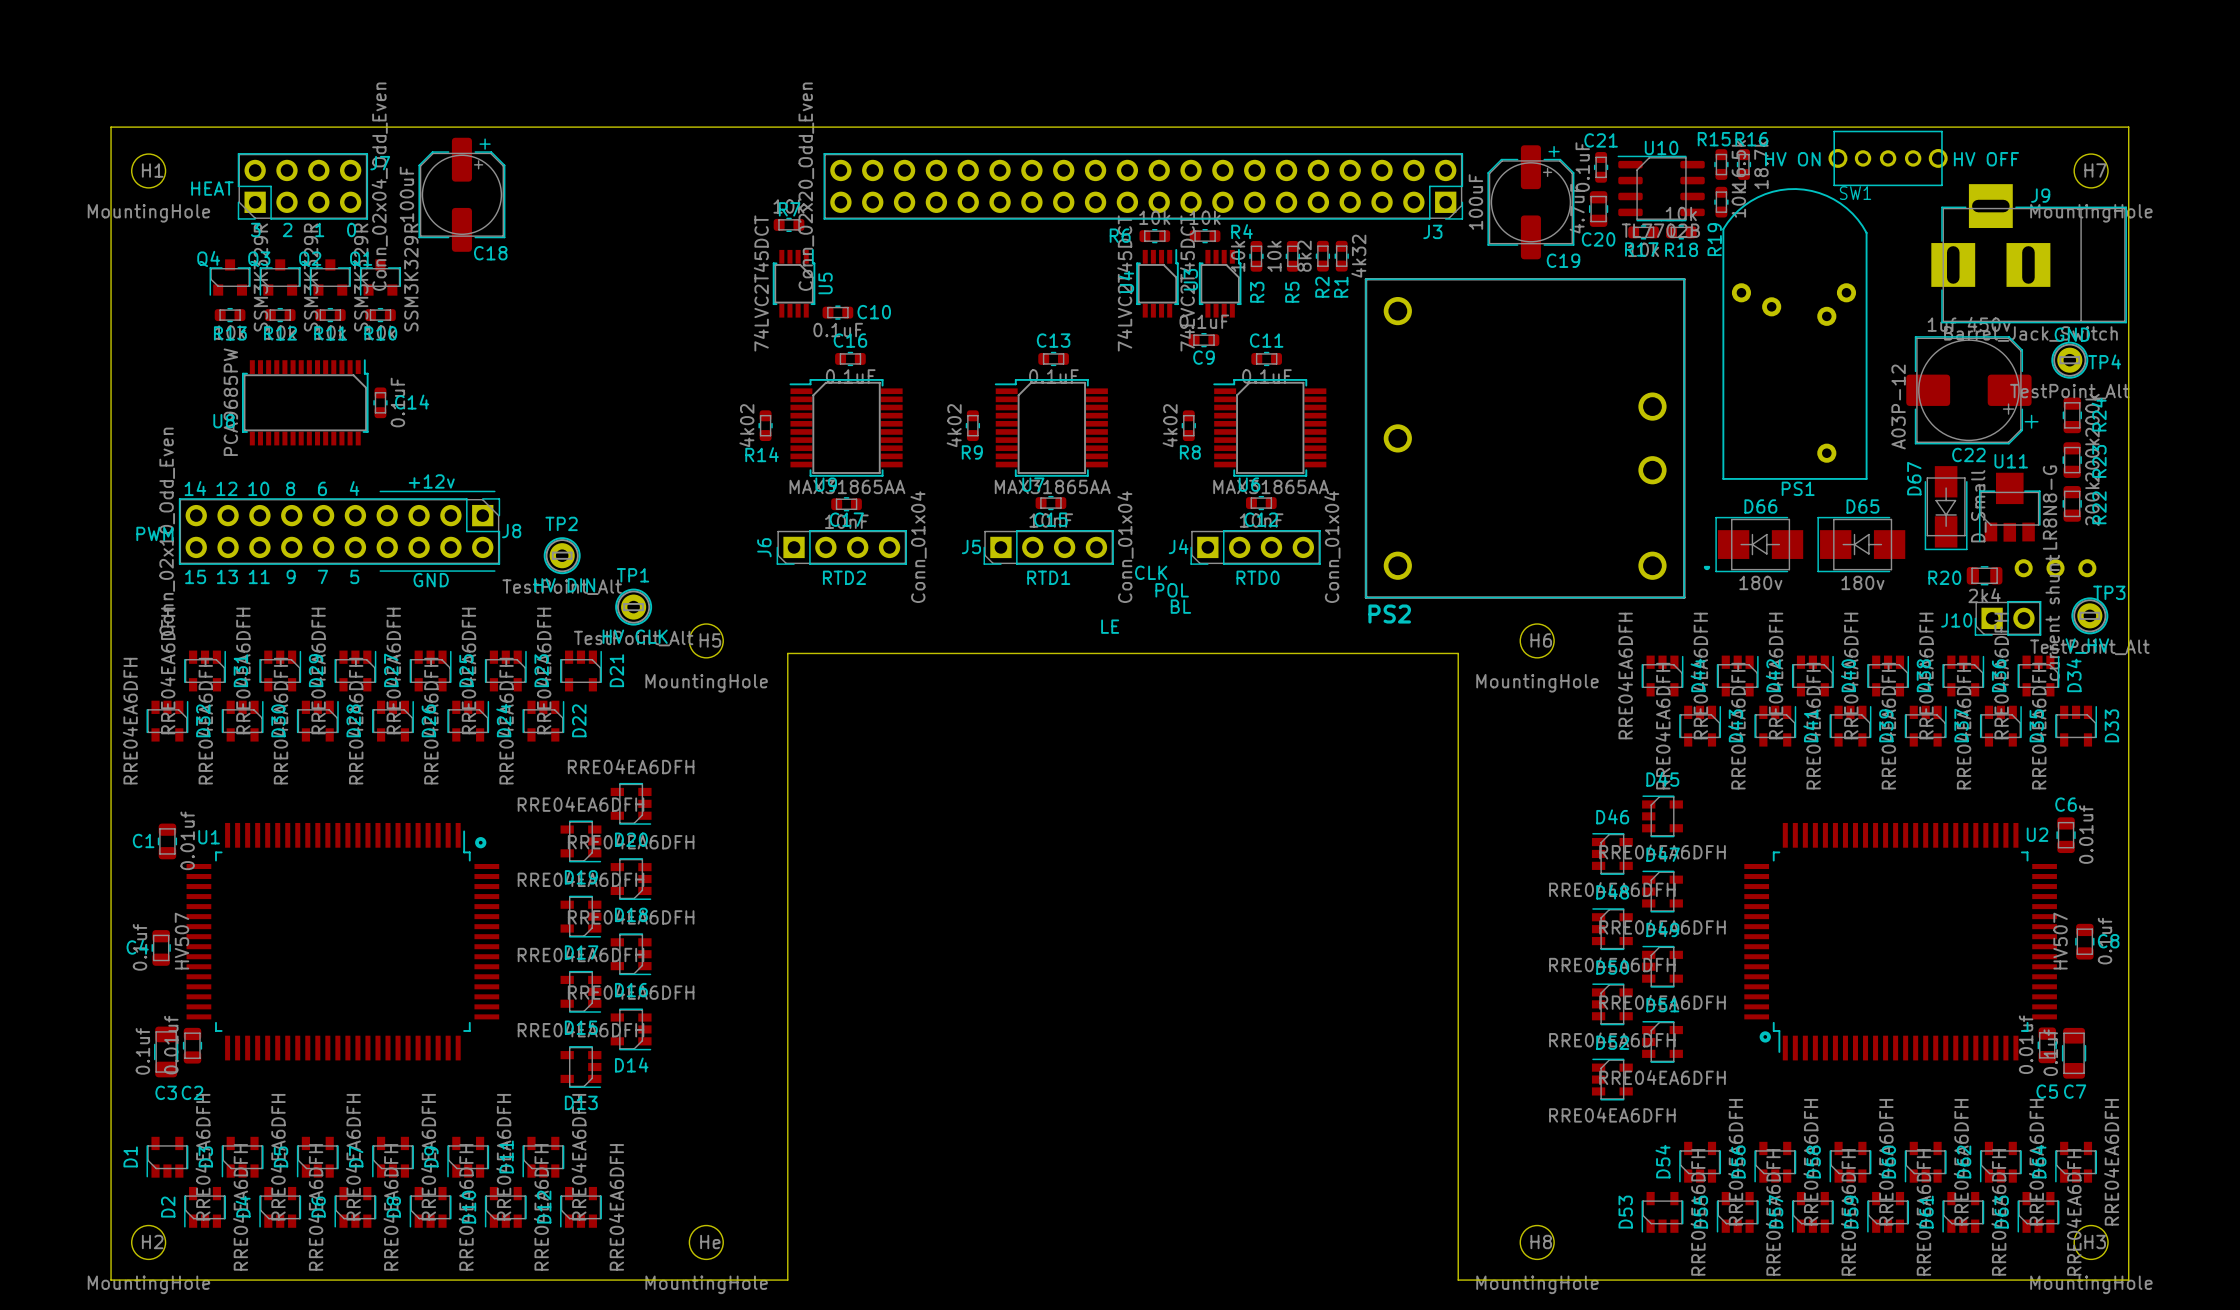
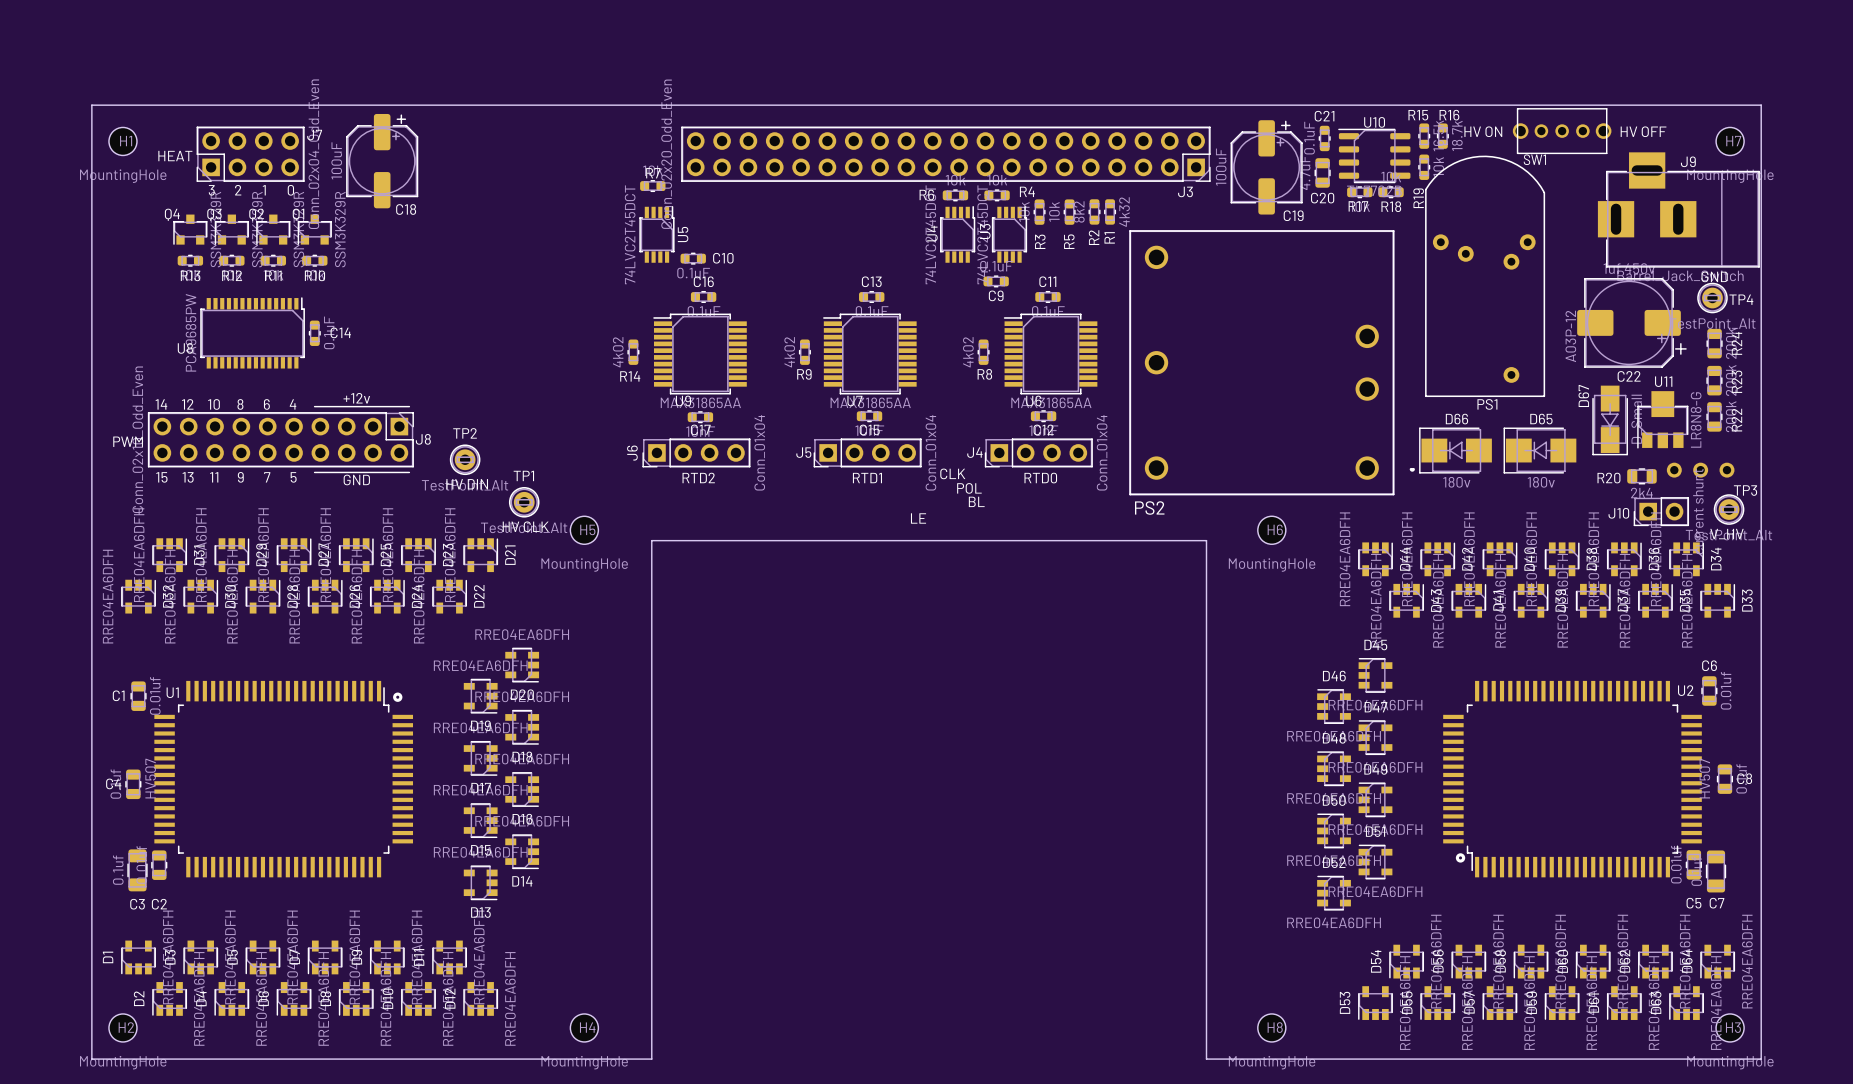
He name: He (710, 1241) -> H4 (587, 1027)

